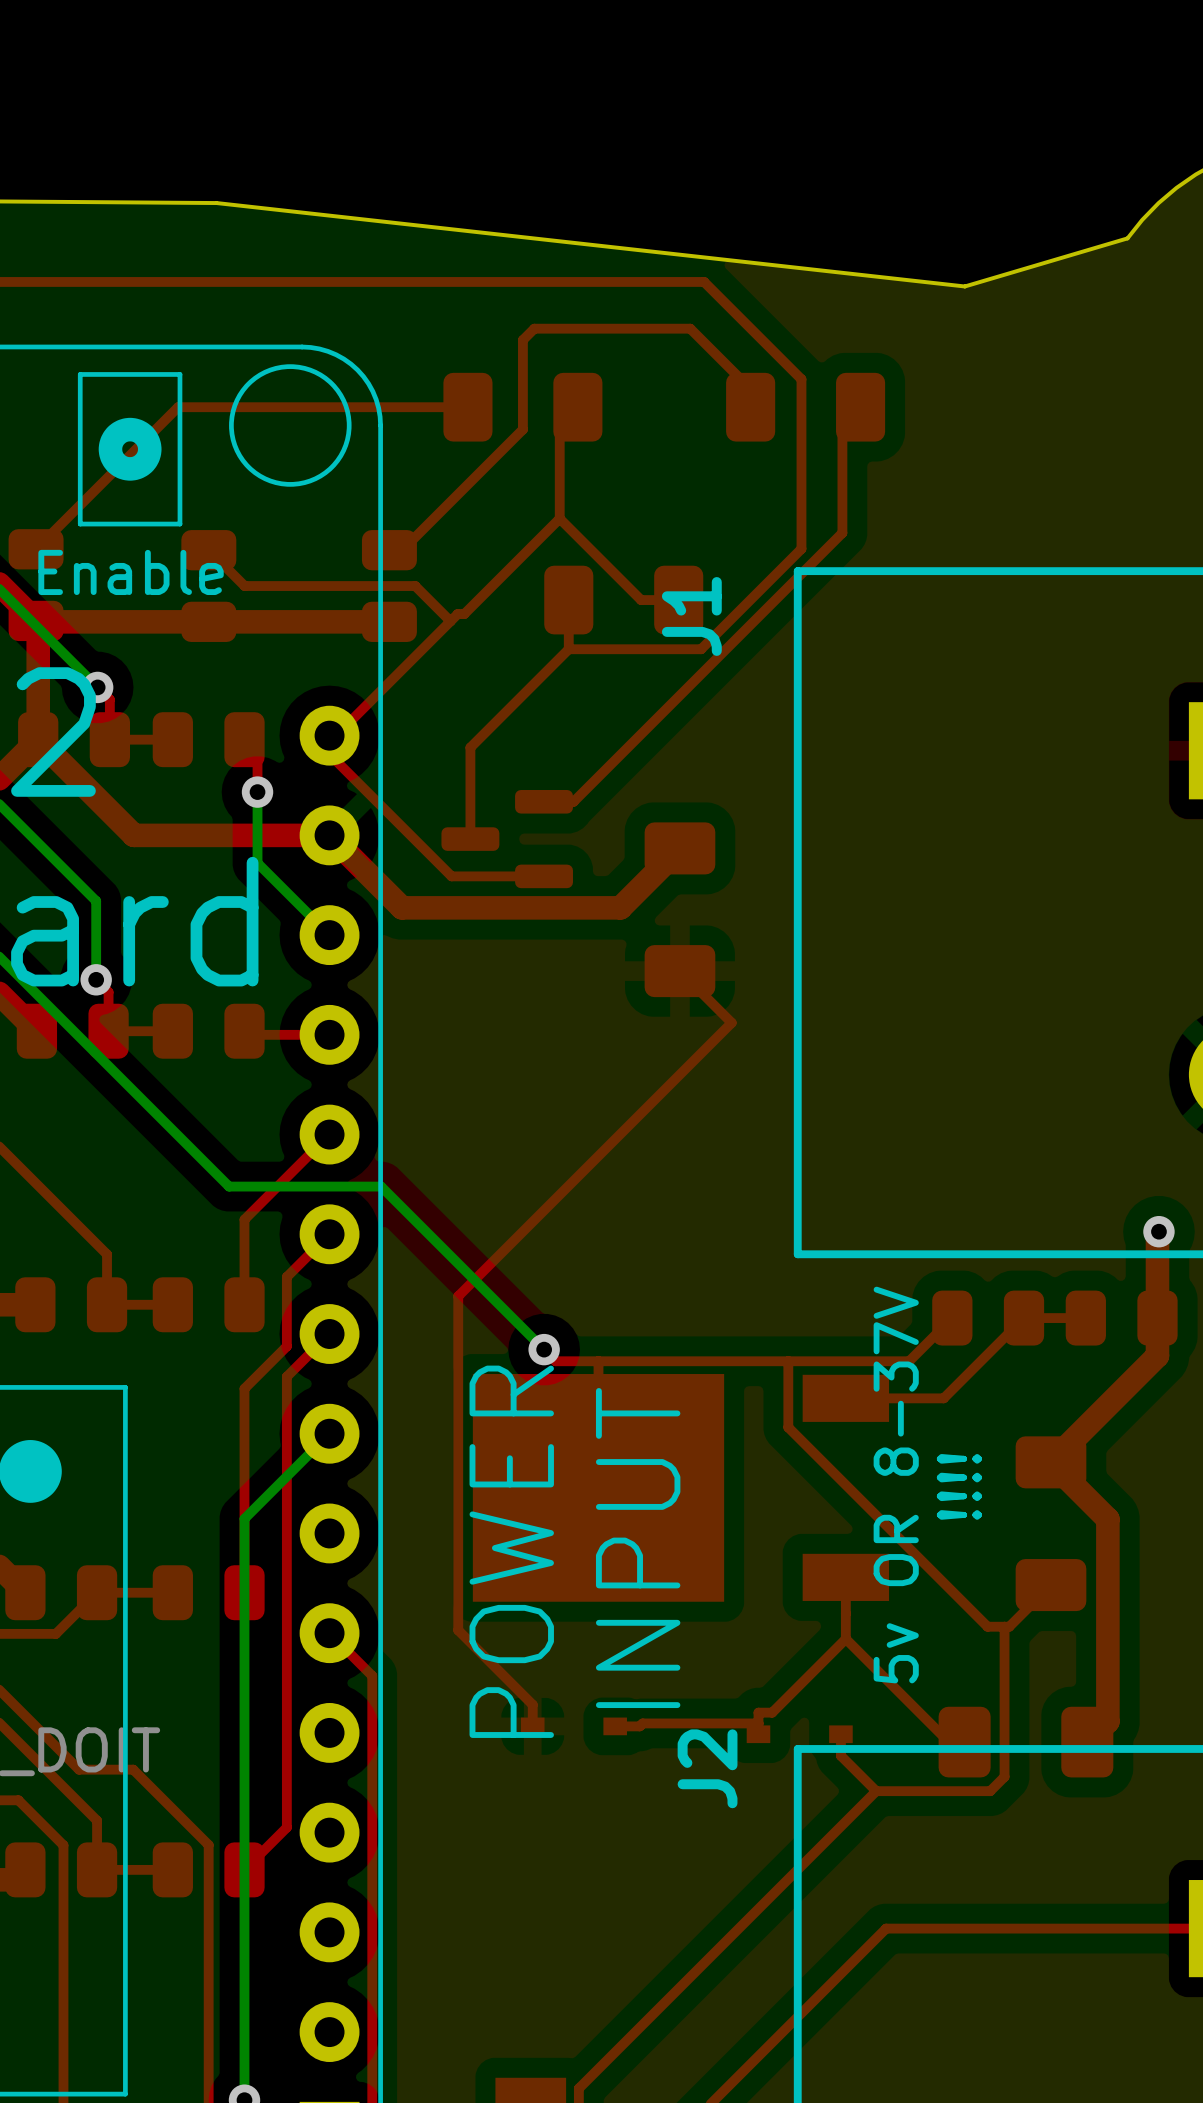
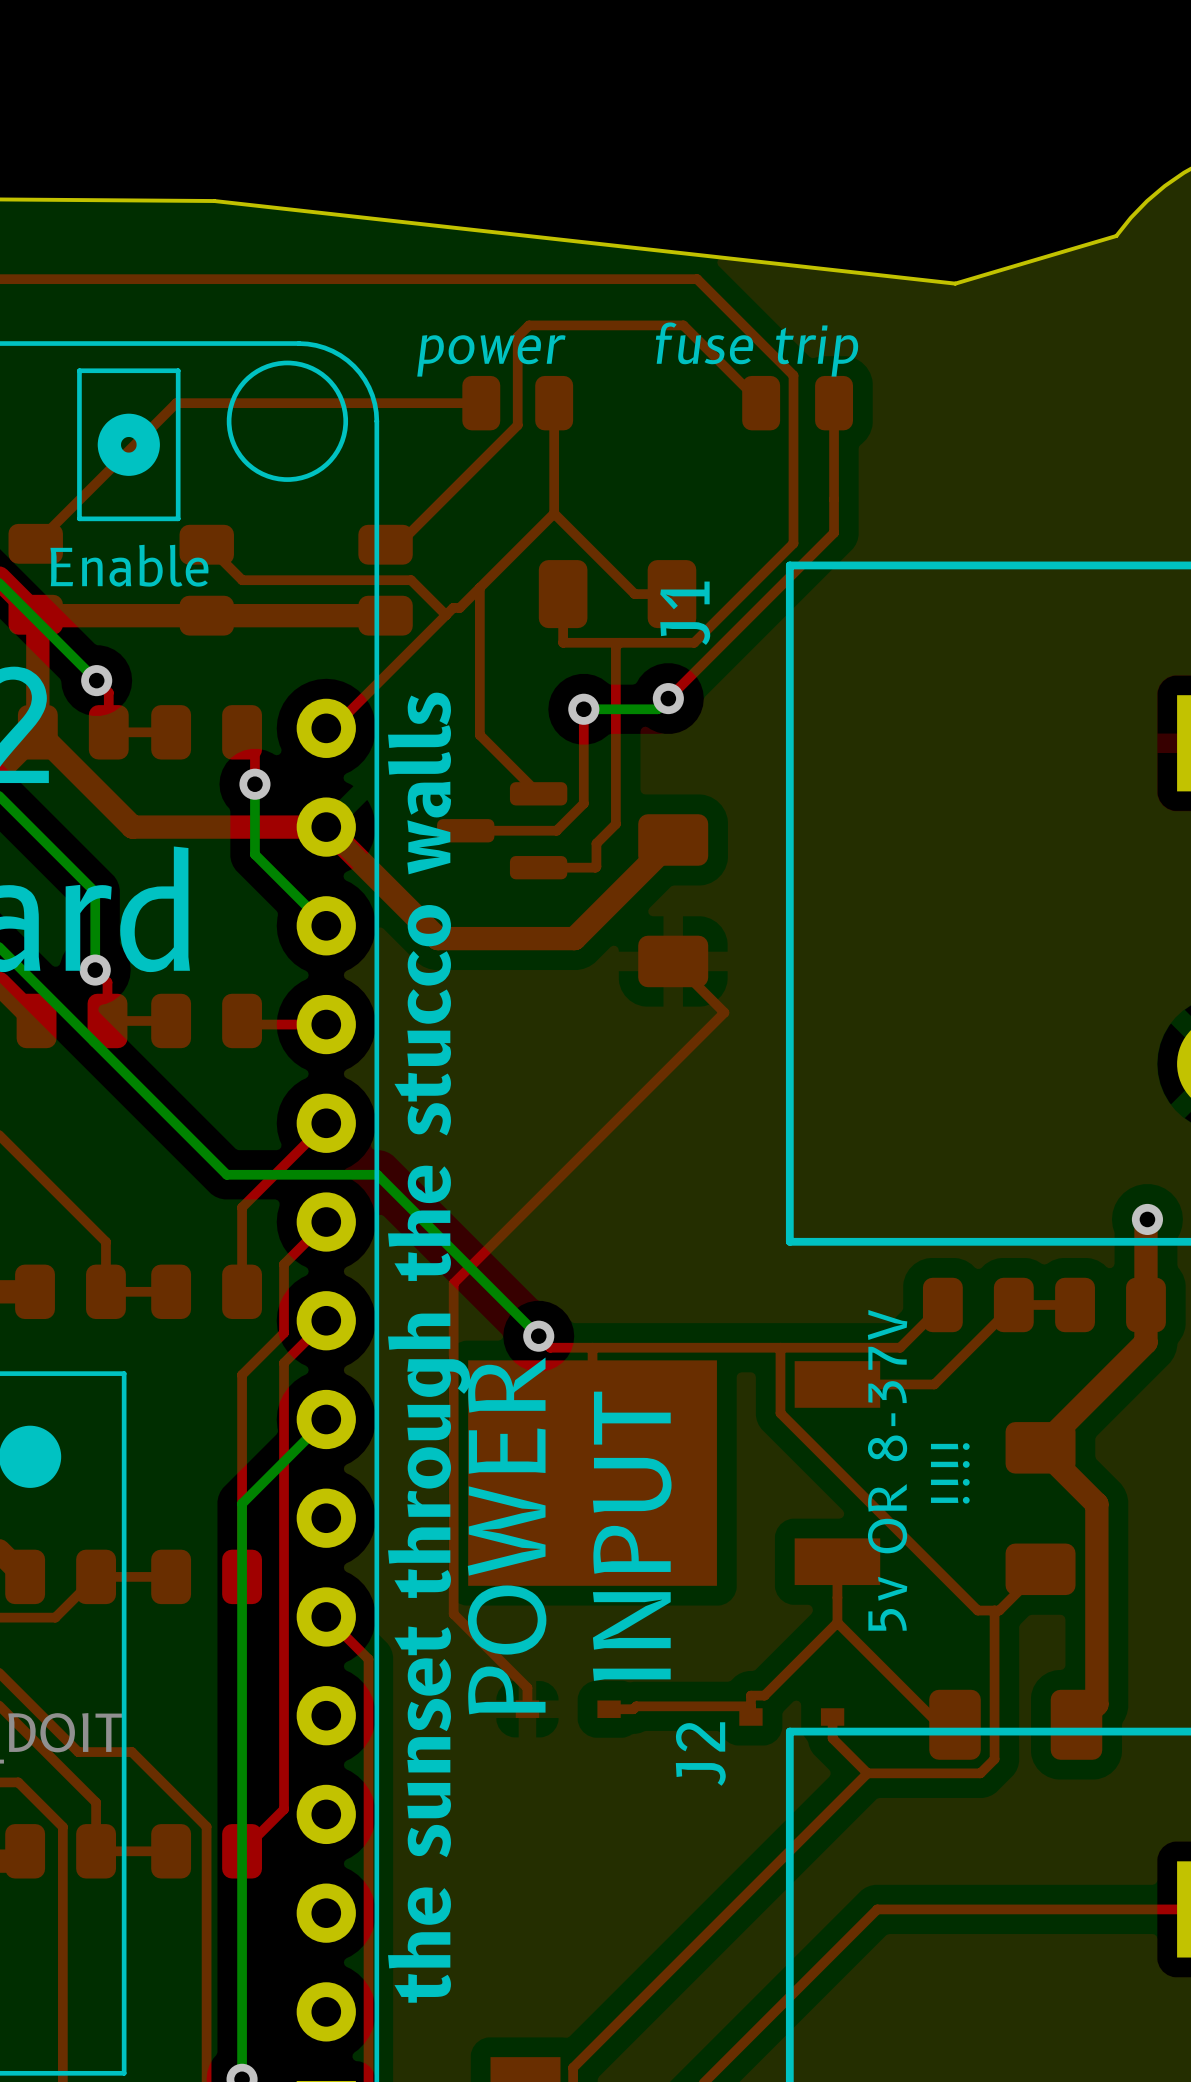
text: none -> power fuse trip (637, 349)
part footprint: [443, 372, 603, 442] -> [462, 375, 574, 431]
part footprint: [726, 372, 886, 442] -> [742, 375, 853, 431]
top track: (842, 532) (573, 801) (544, 801) -> (834, 527) (834, 532) (668, 698)
top track: none -> (479, 587) (479, 735) (538, 793)
top track: (568, 649) (470, 747) (470, 839) -> (583, 709) (583, 803) (556, 830) (465, 830)
bottom track: none -> (668, 698) (657, 709) (583, 709)
via: none -> (668, 698)
via: none -> (583, 709)
top track: (329, 754) (451, 876) (544, 876) -> (619, 642) (615, 646) (615, 824) (596, 843) (595, 867) (538, 867)
top track: (620, 907) (402, 907) -> (614, 898) (574, 938) (437, 938) (398, 898)
text: none -> the sunset through the stucco walls (429, 1347)

